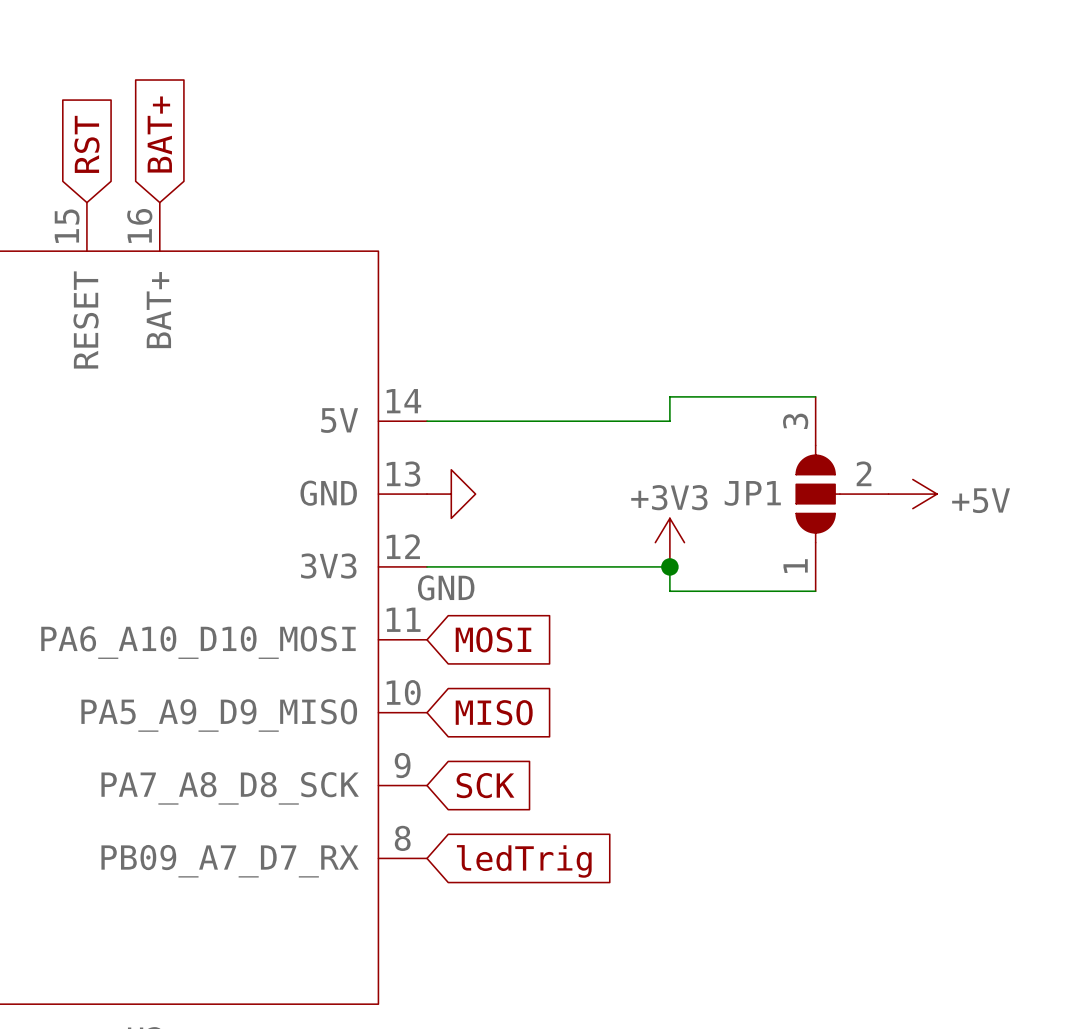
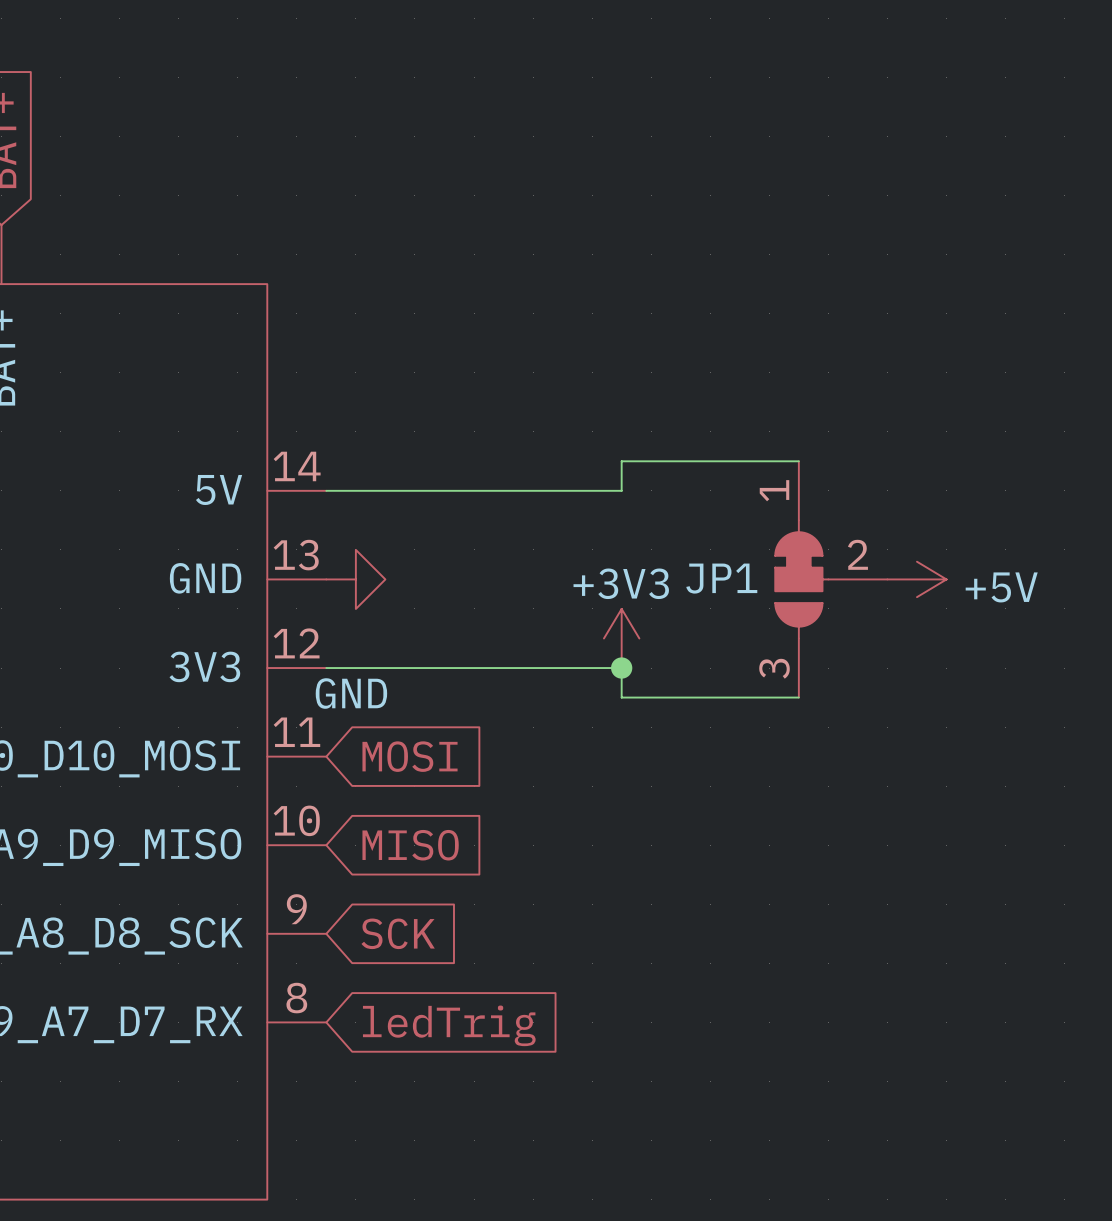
JP1 symbol: [796, 396, 889, 592] -> [775, 461, 888, 698]

